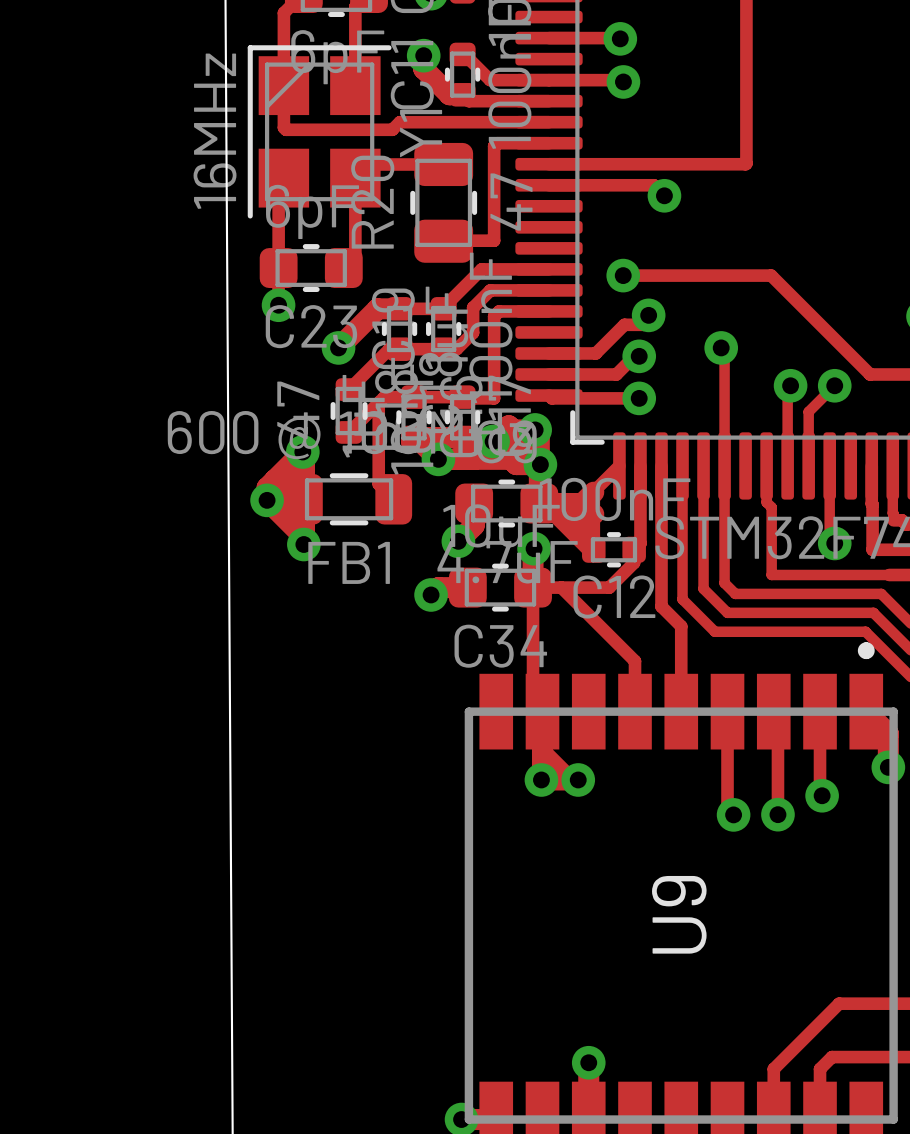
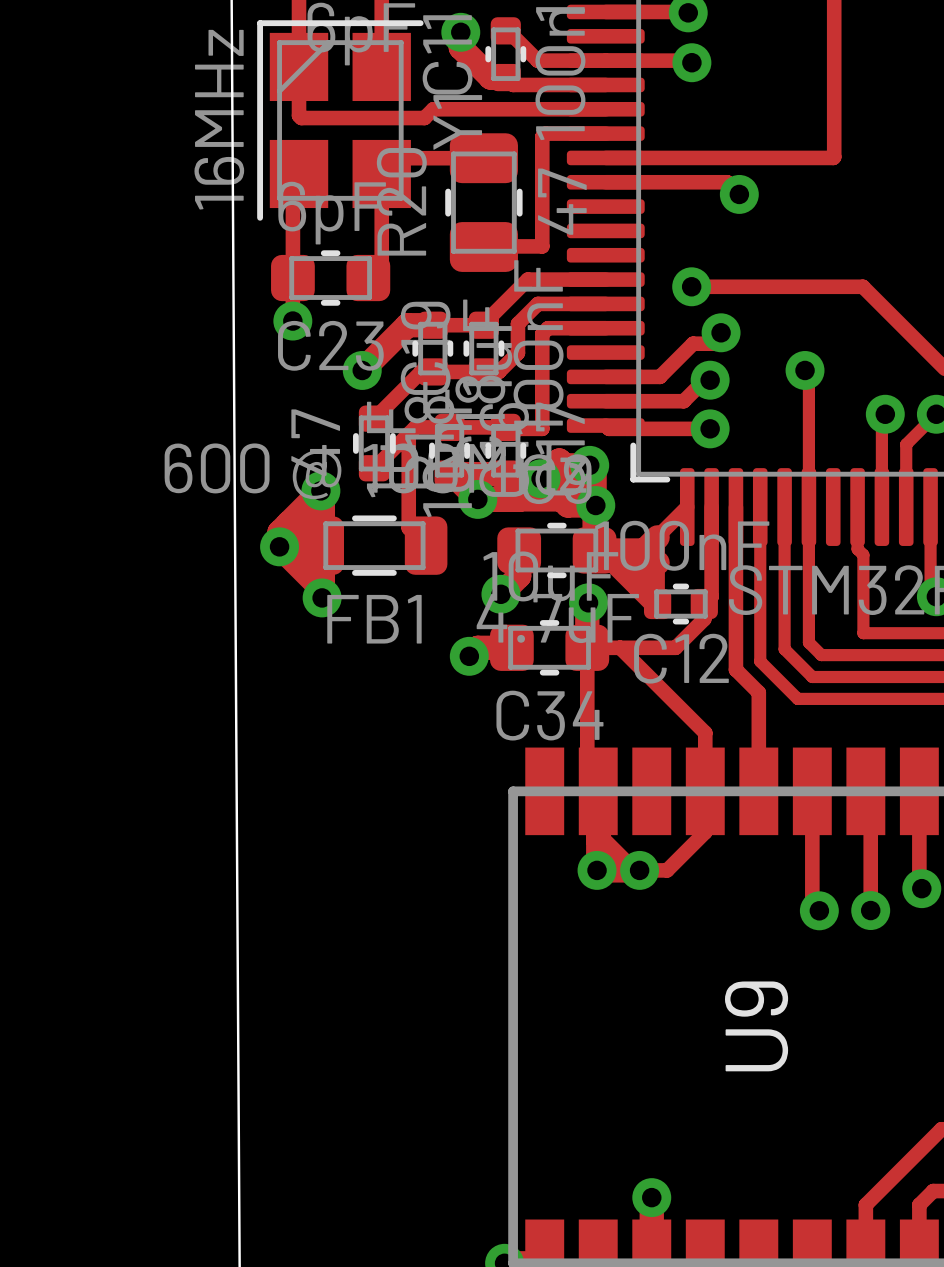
track: none -> (705, 791) (705, 832) (667, 870) (639, 870)

